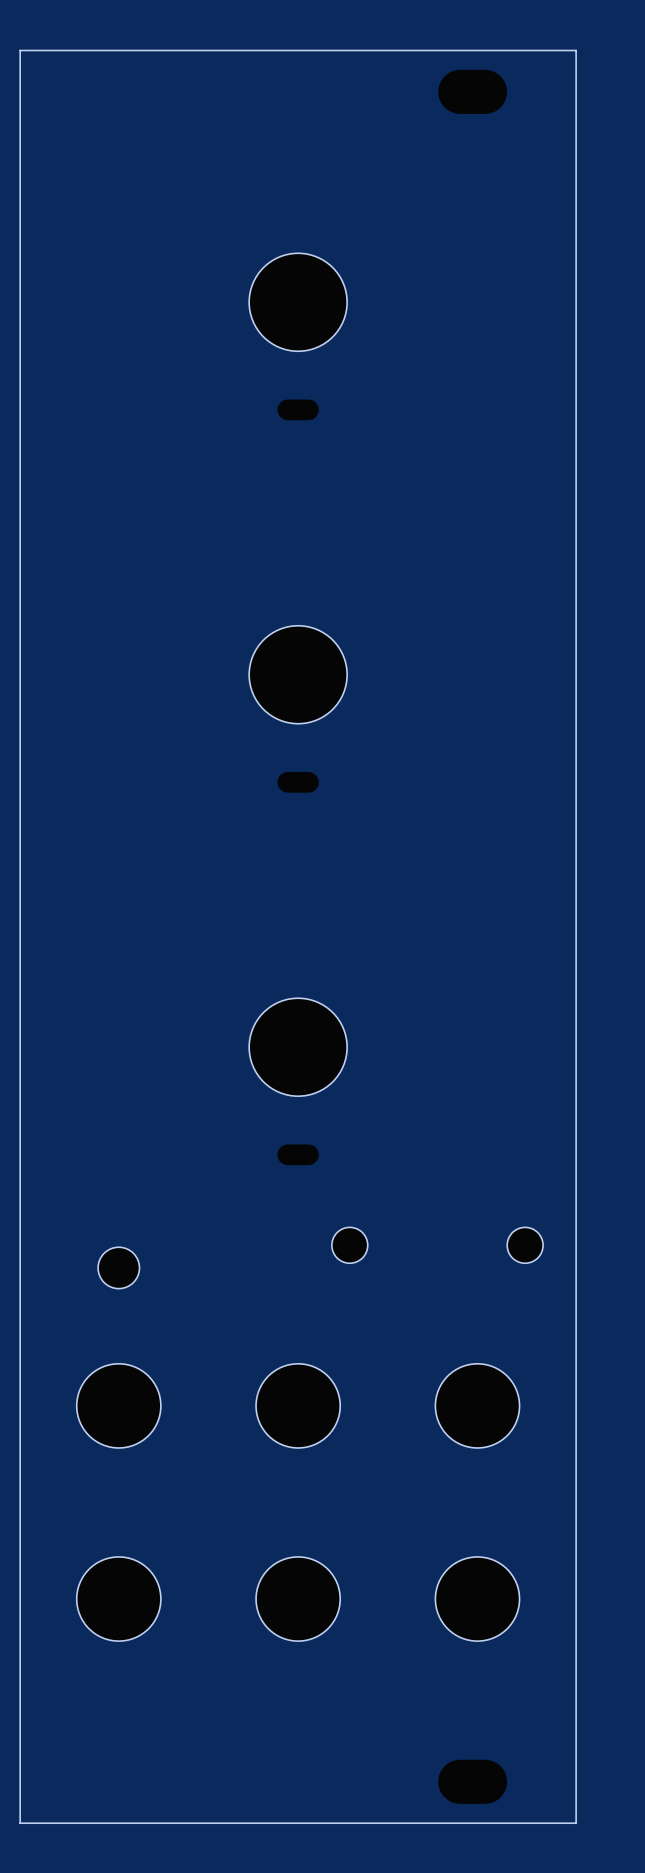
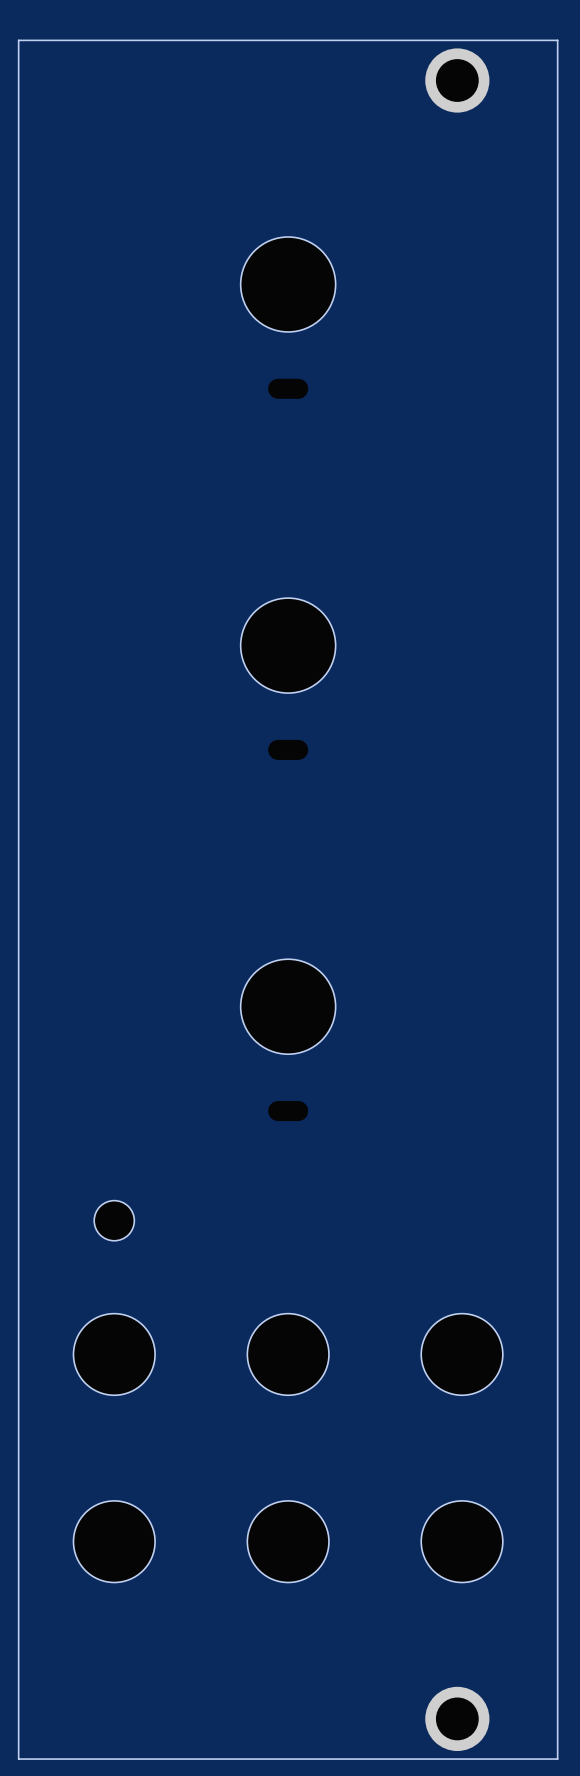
part footprint: [438, 69, 508, 114] -> [425, 48, 490, 113]
part: (349, 1245) -> none
part: (525, 1245) -> none
part footprint: [438, 1759, 508, 1804] -> [425, 1686, 490, 1752]

